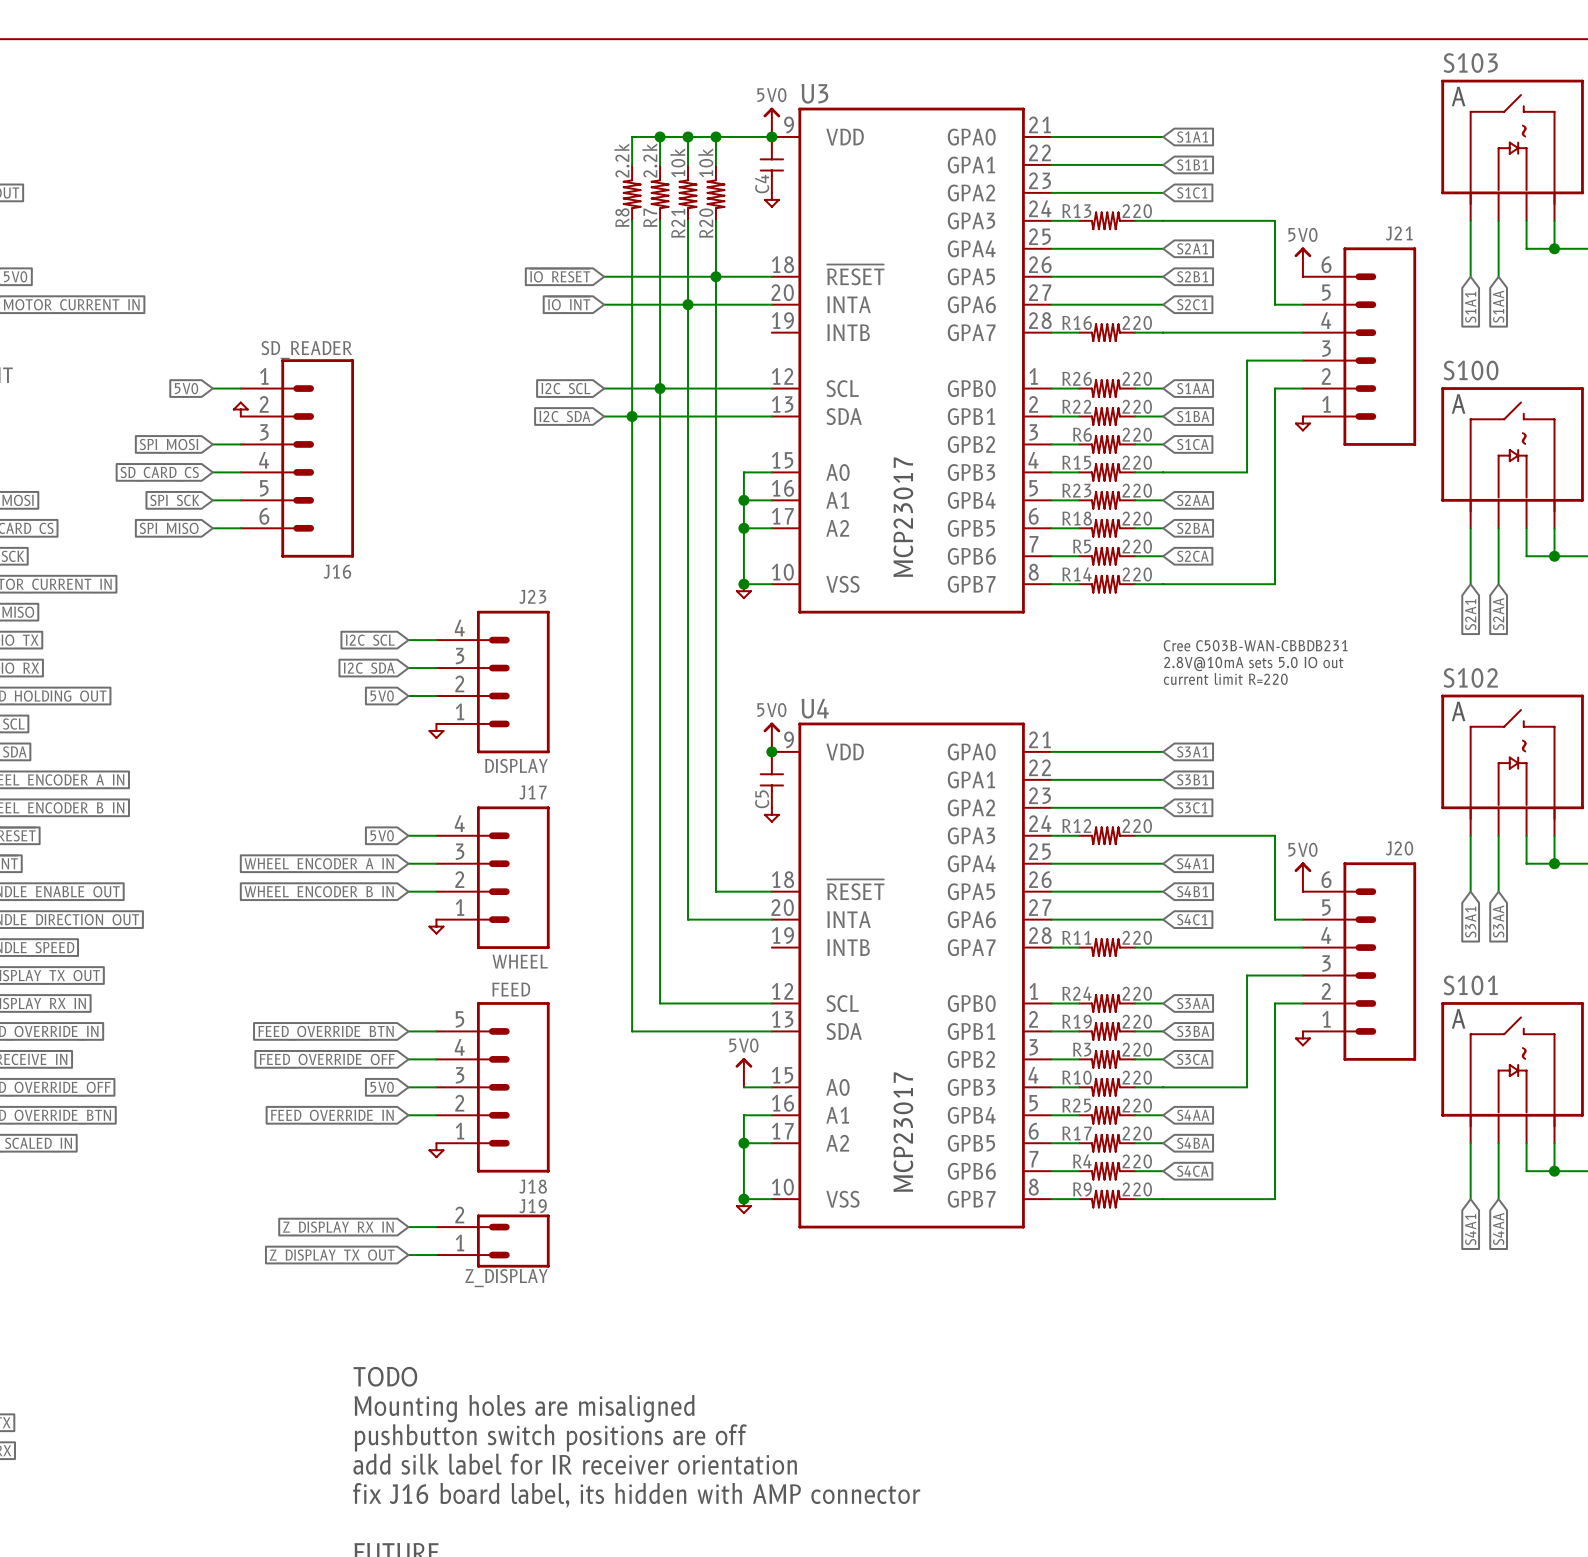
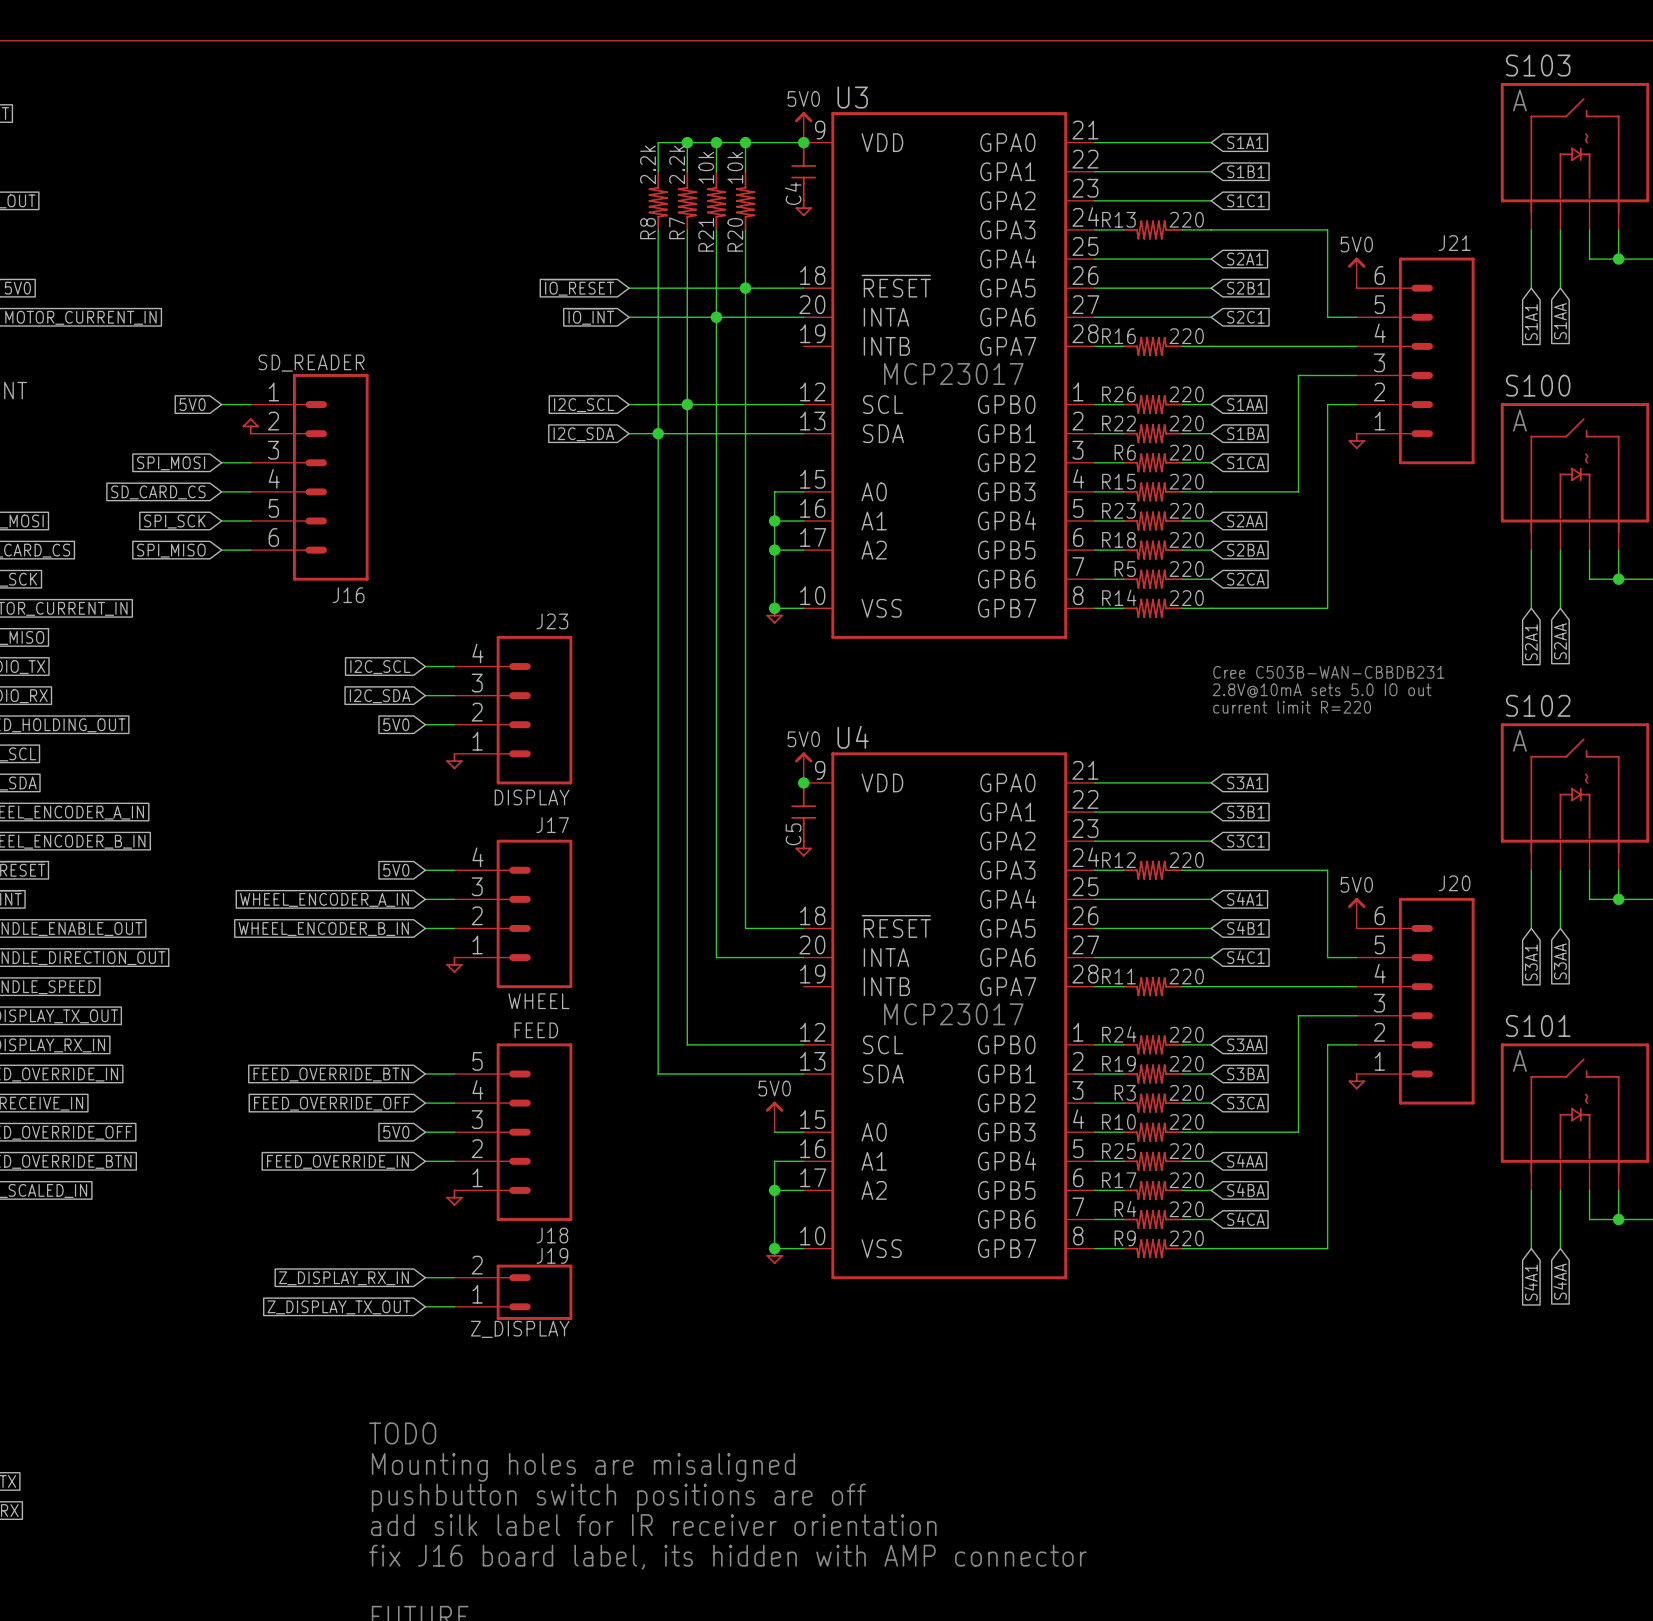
U3 text rotation: 0° (903, 517) -> 90° clockwise (953, 374)
U3 text position: MCP23017 (903, 517) -> MCP23017 (953, 374)
U4 text rotation: 0° (903, 1132) -> 90° clockwise (953, 1014)
U4 text position: MCP23017 (903, 1132) -> MCP23017 (953, 1014)

